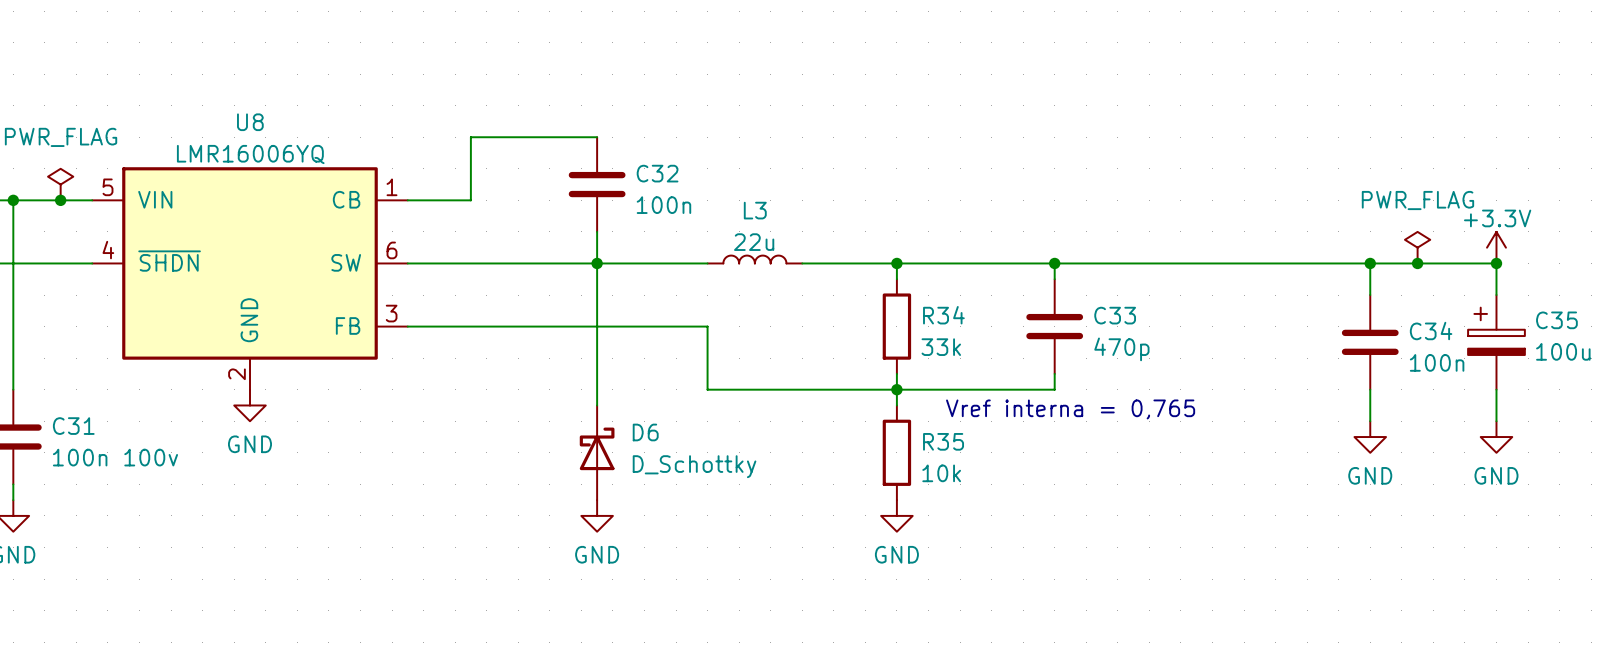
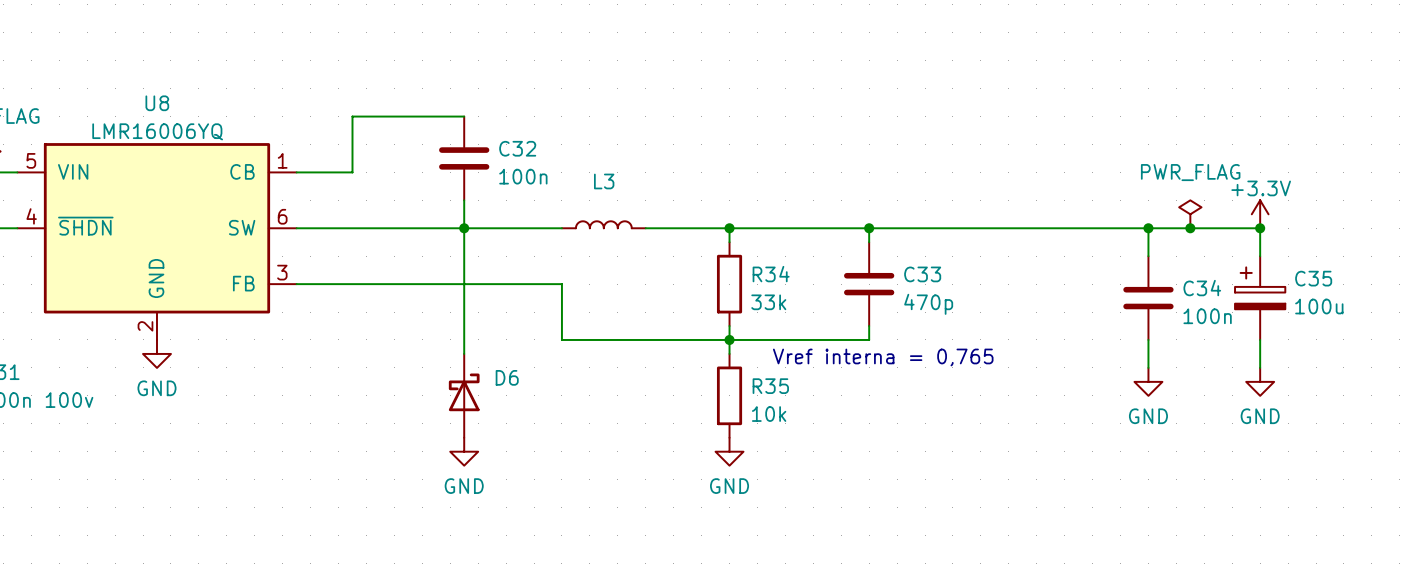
L3 value: 22u (754, 242) -> none
D6 value: D_Schottky (694, 466) -> none

